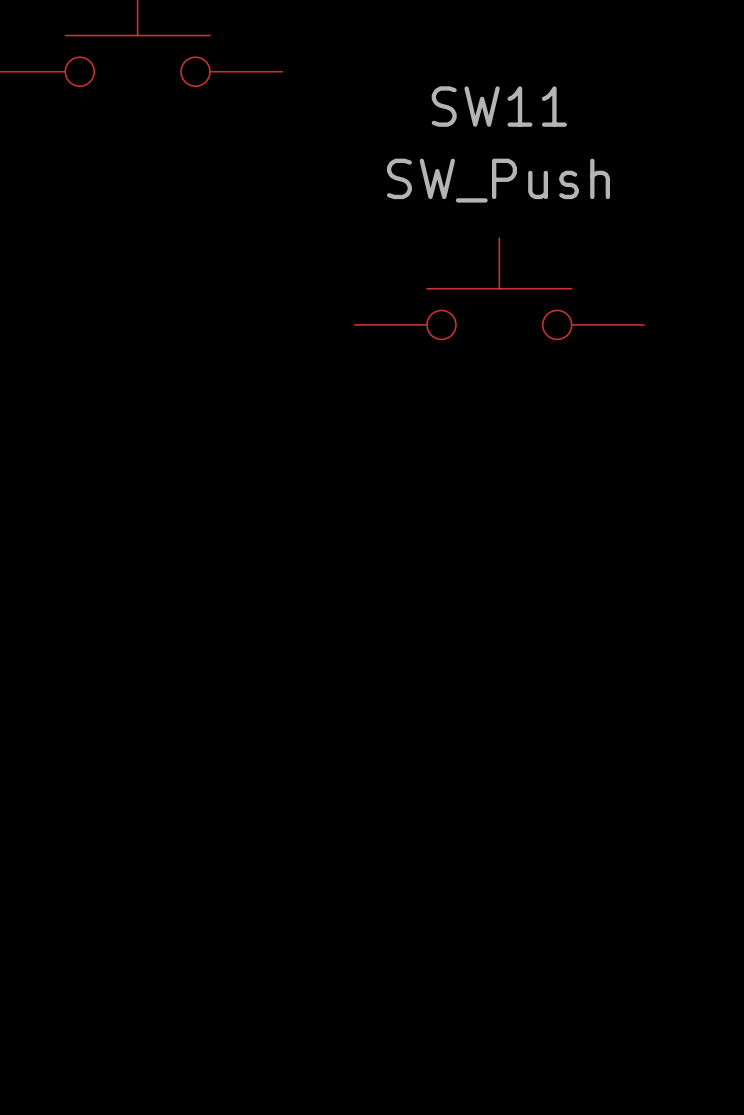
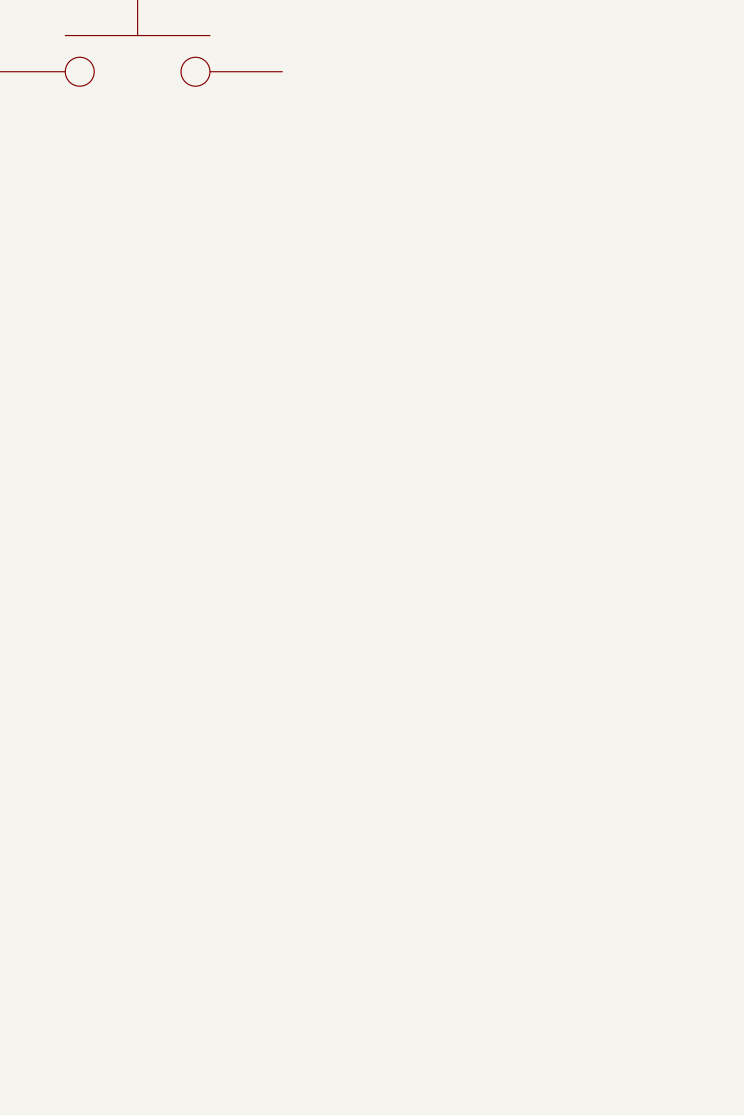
SW11: SW_Push (499, 288) -> none

